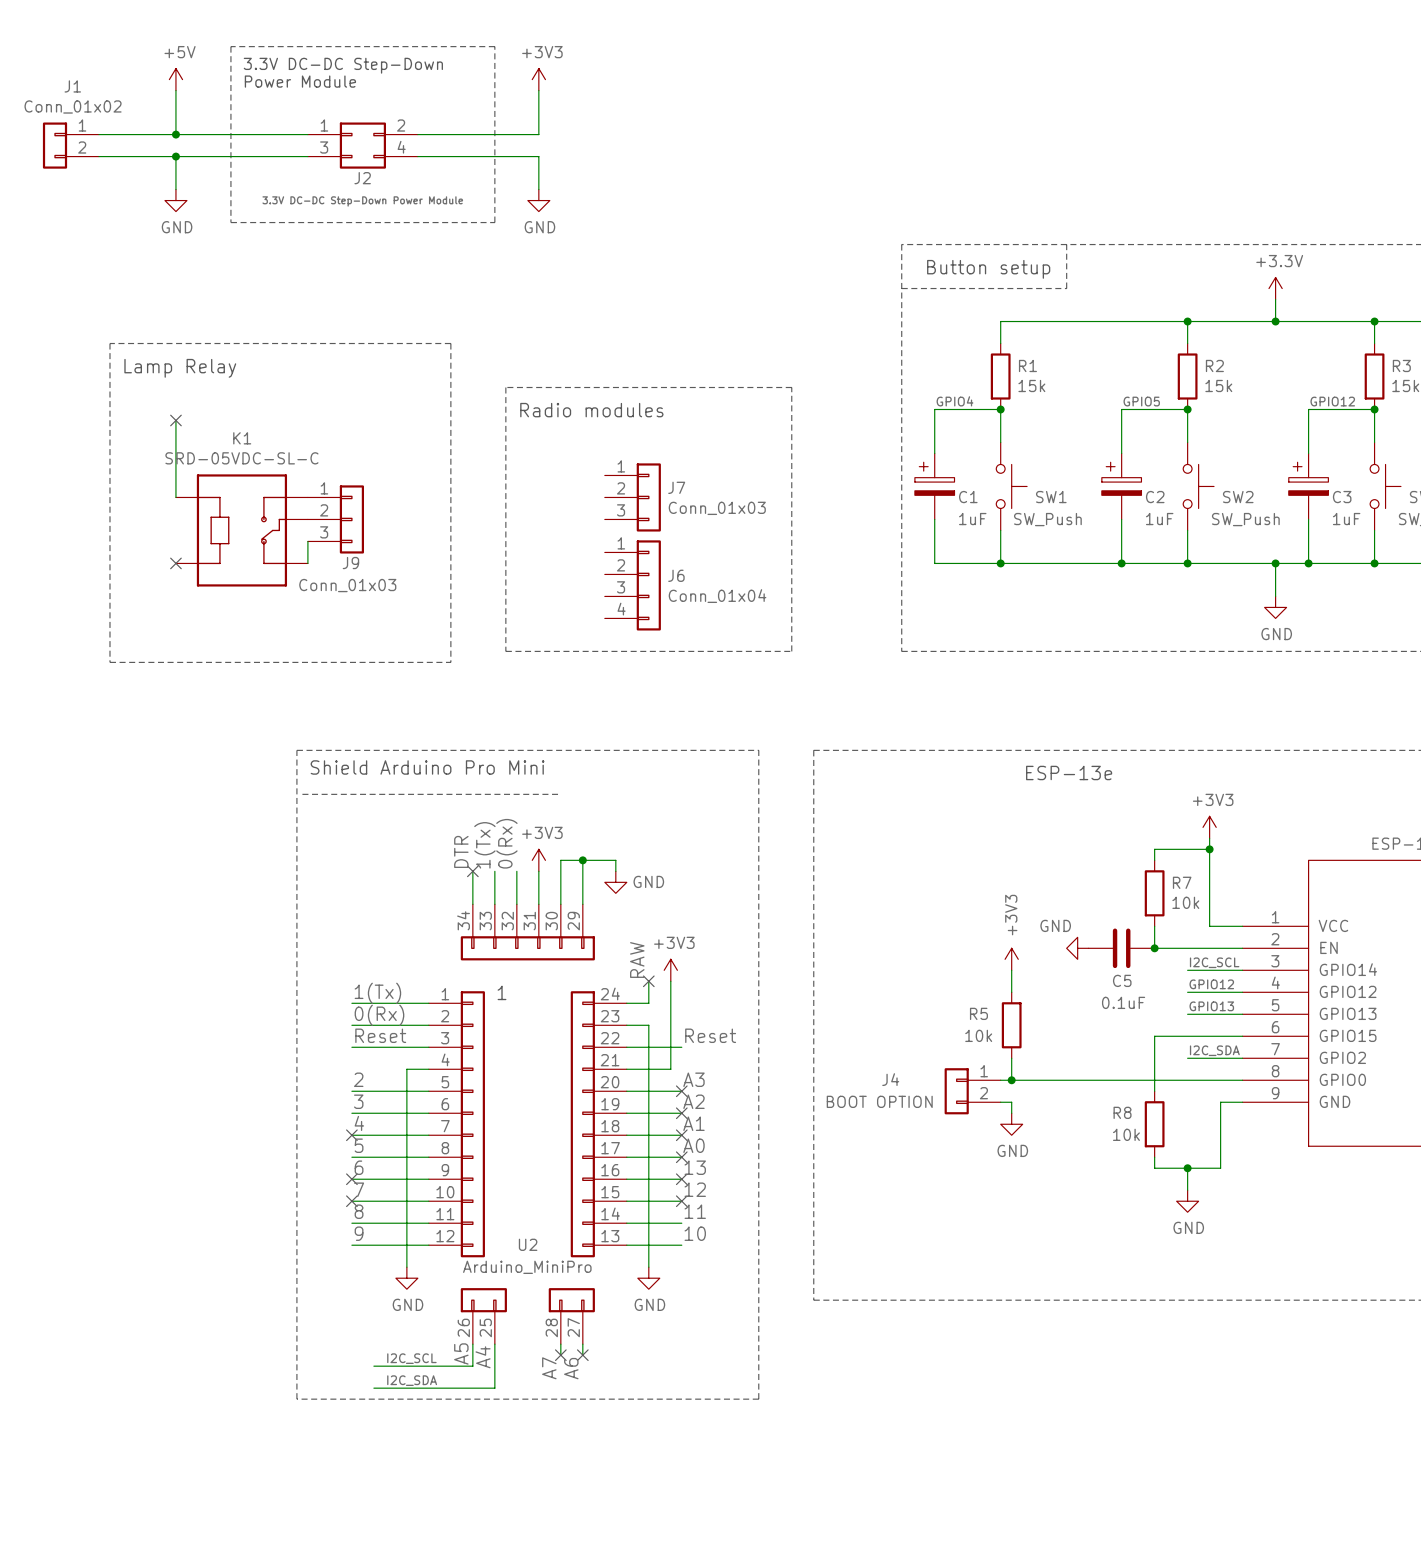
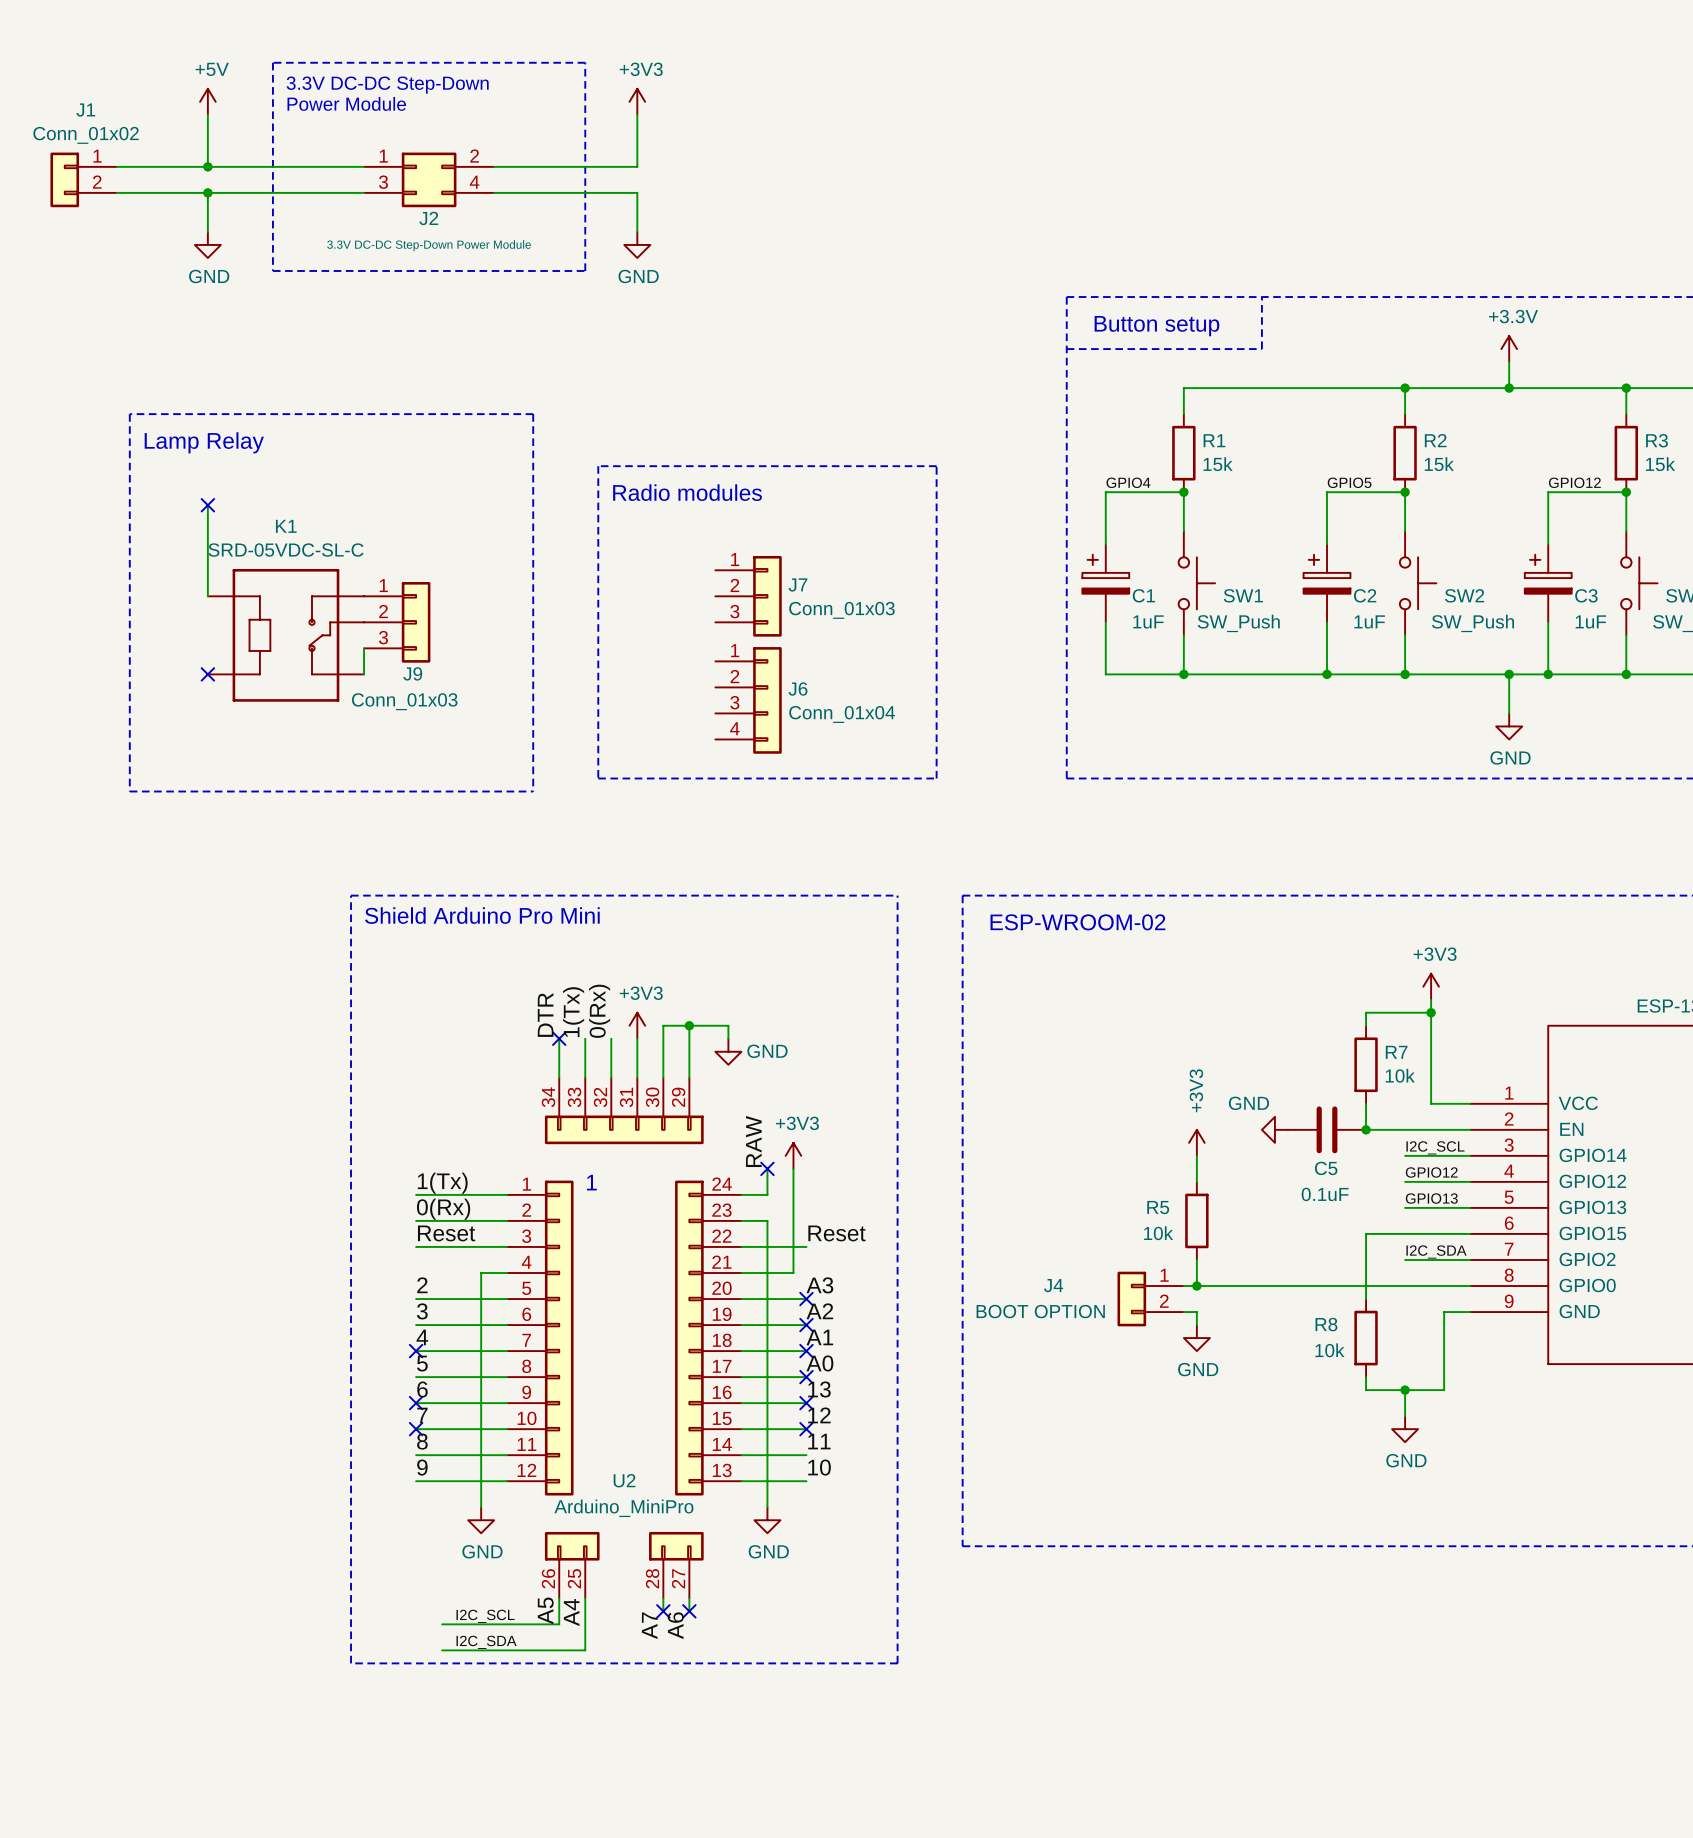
text: none -> ESP-WROOM-02 (1077, 922)
text: ESP-13e (1069, 772) -> none
line: (302, 794) (560, 794) -> none

